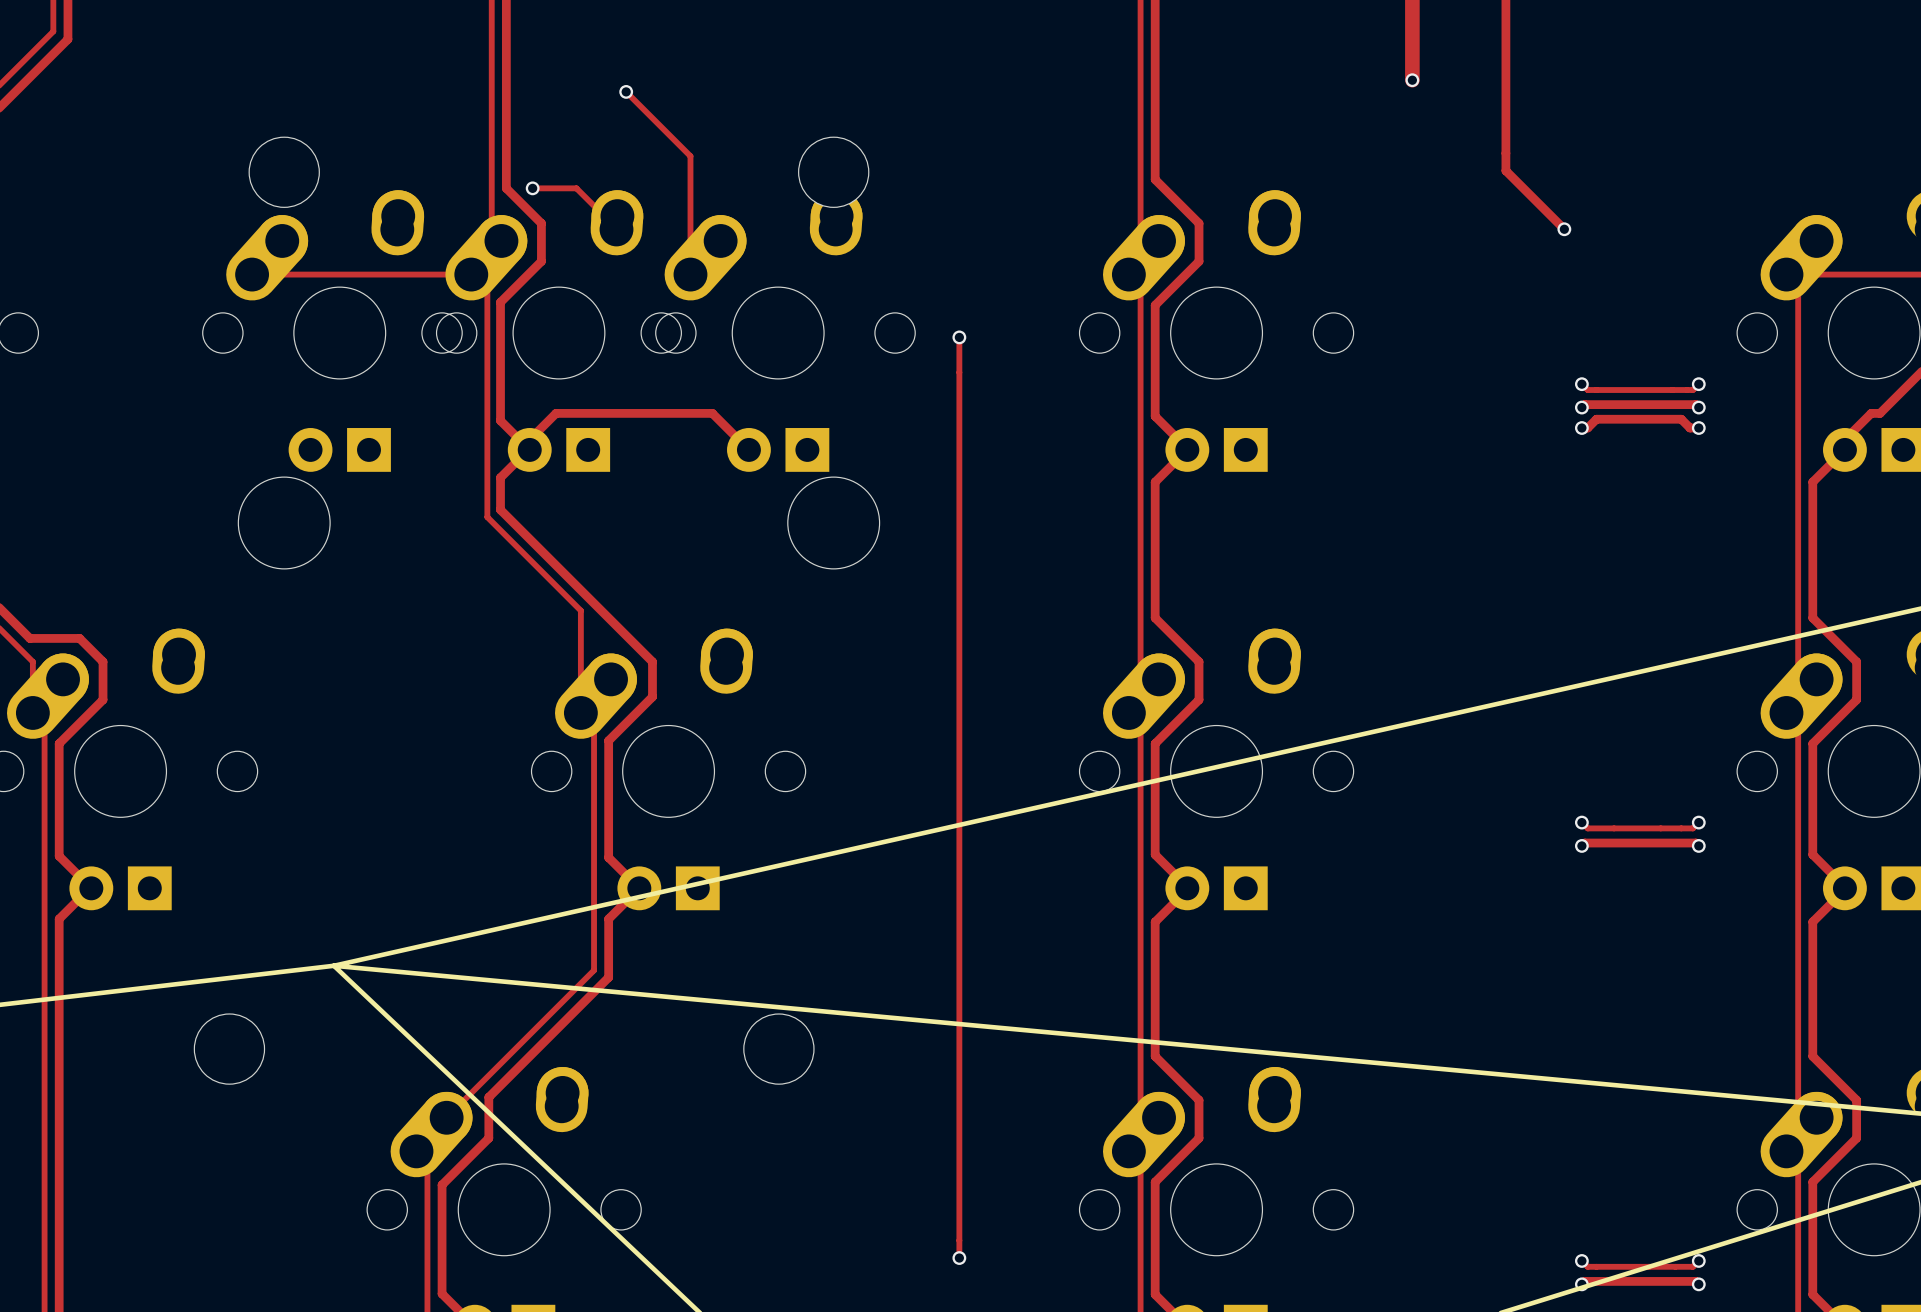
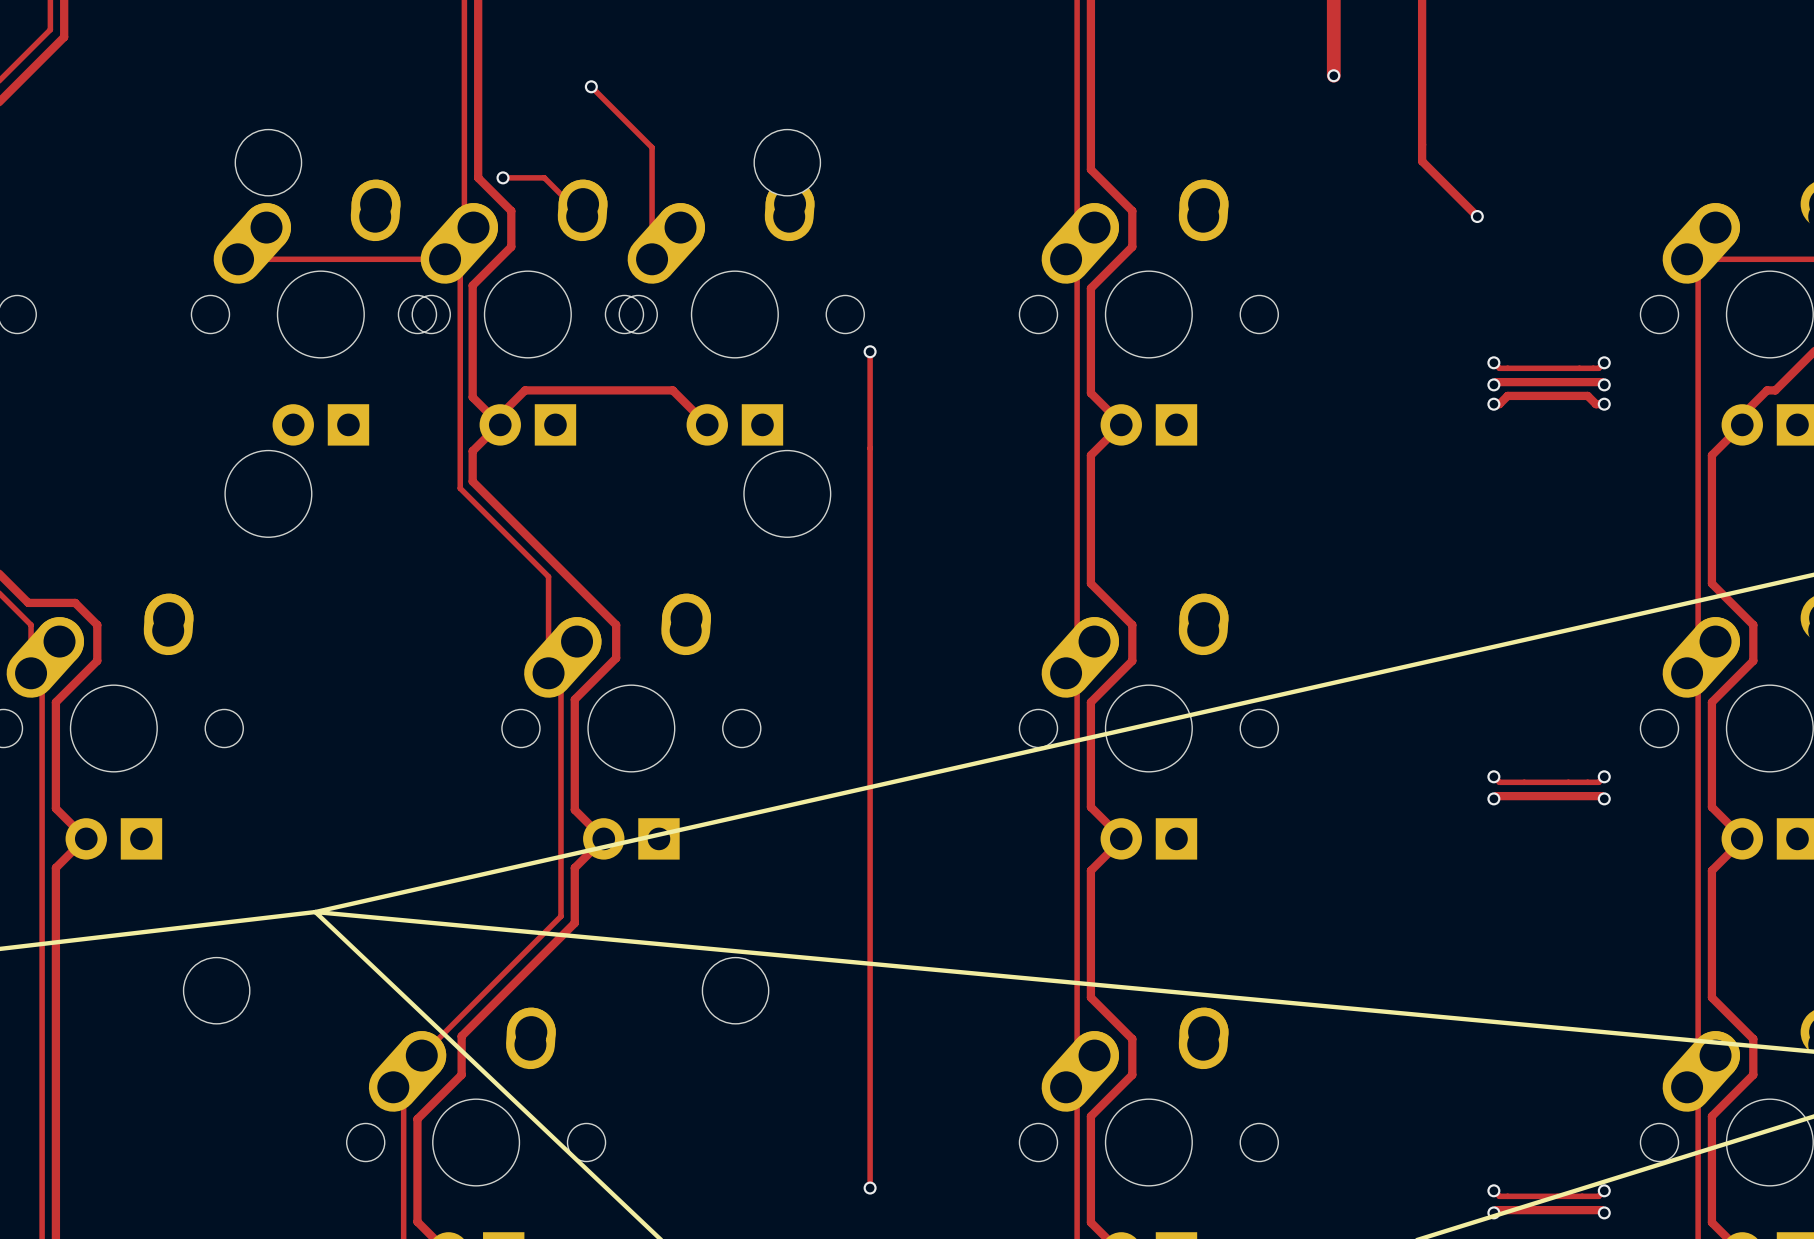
track: (959, 337) (959, 1258) -> none
via position: (959, 337) -> (870, 351)
track: none -> (870, 351) (870, 1188)
via position: (959, 1258) -> (870, 1188)

